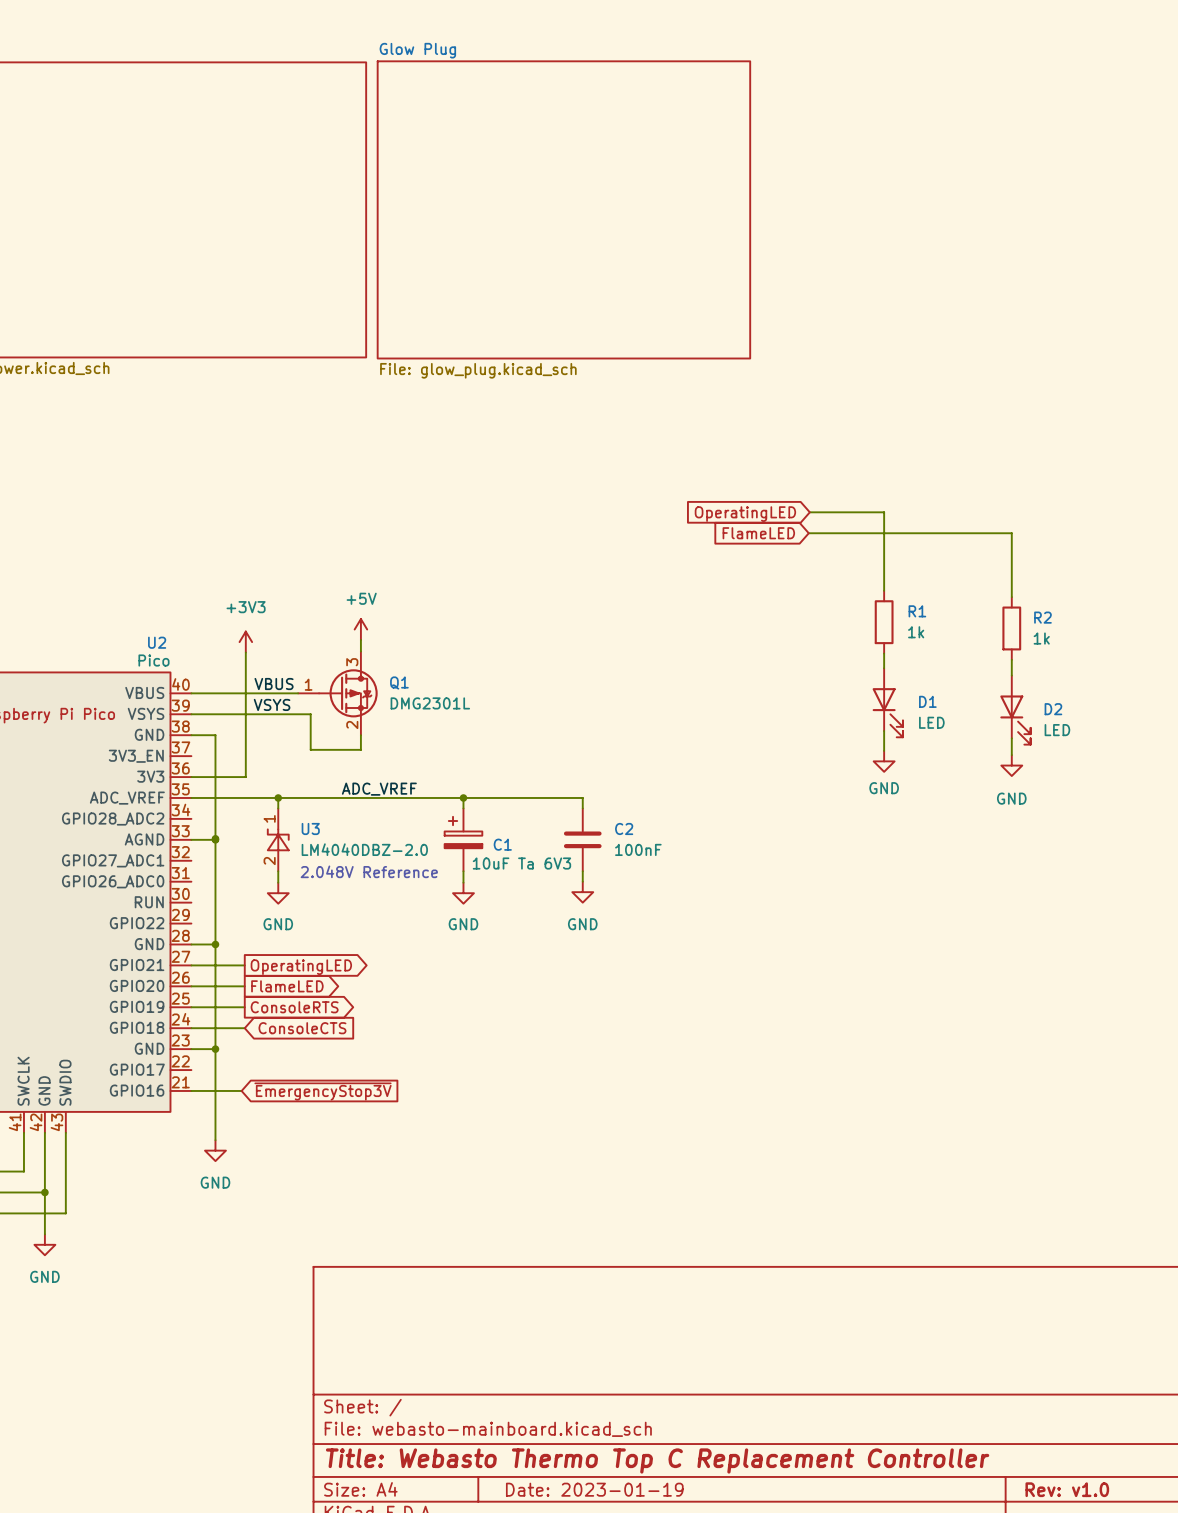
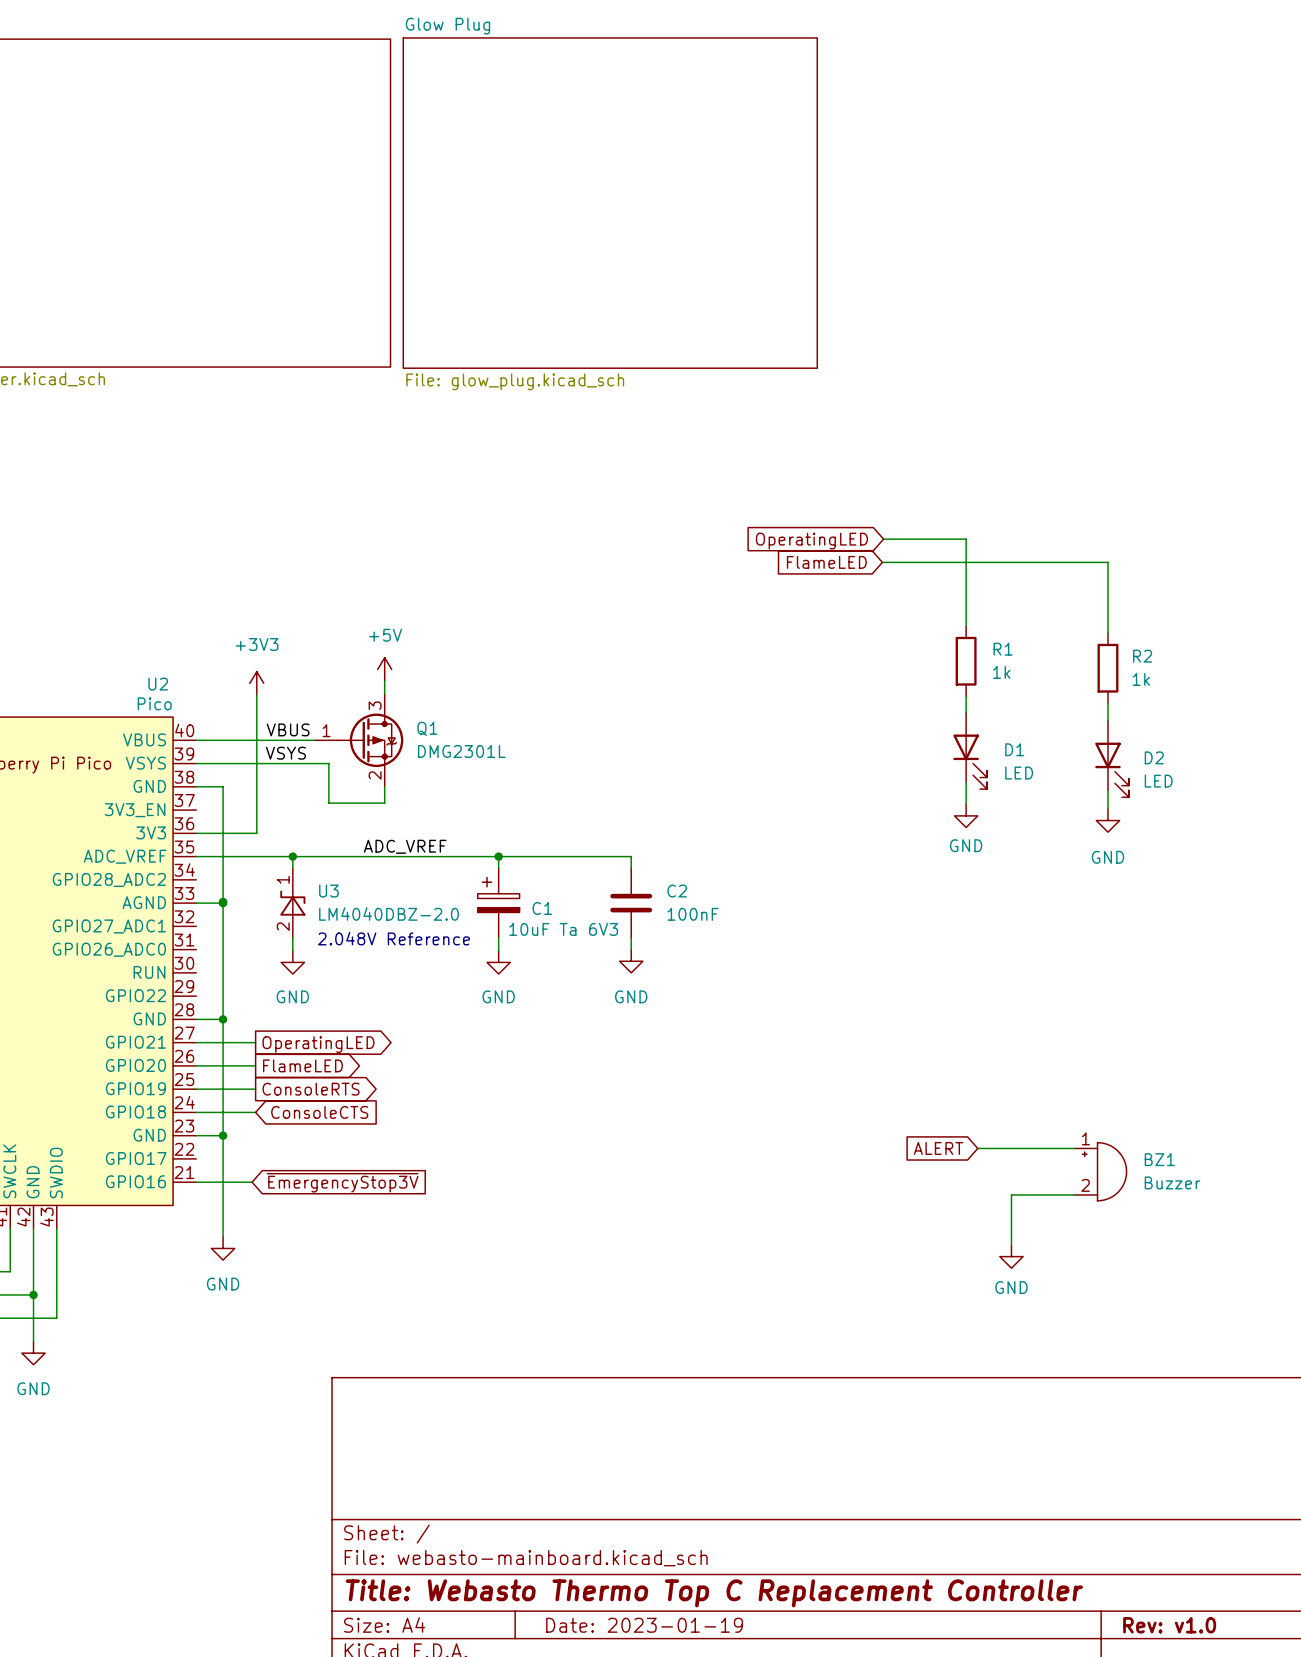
global label: none -> ALERT (938, 1148)
wire: none -> (977, 1148) (1074, 1148)
BZ1: none -> Buzzer (1100, 1171)
wire: none -> (1074, 1194) (1011, 1194) (1011, 1244)
power symbol: none -> GND (1011, 1256)

